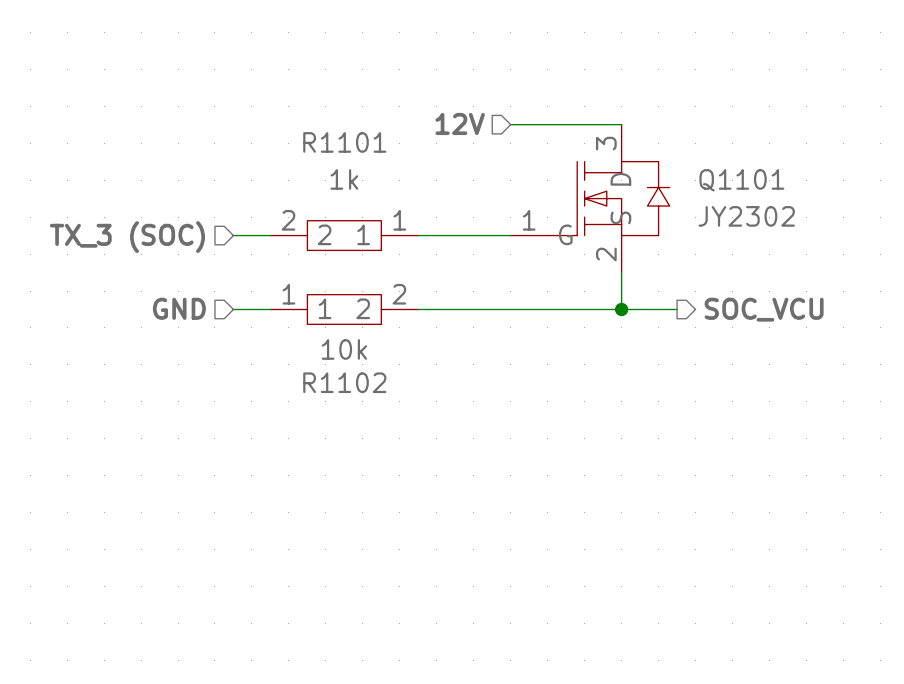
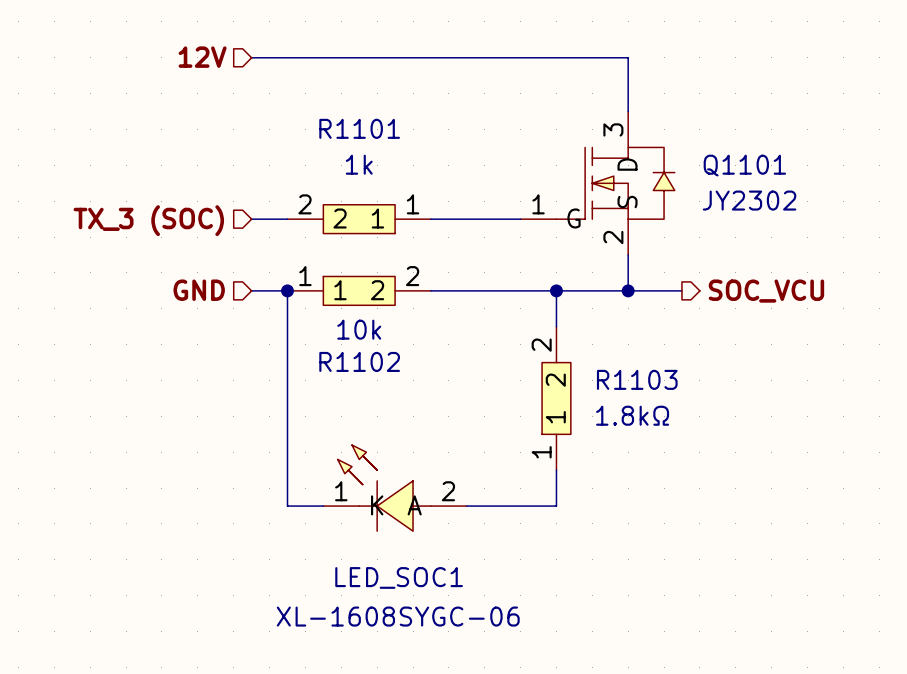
hierarchical label position: 12V (460, 123) -> 12V (202, 57)
wire: (510, 124) (621, 124) -> (251, 57) (628, 57) (628, 111)
wire: none -> (287, 290) (287, 506) (323, 506)
junction: none -> (287, 290)
wire: none -> (556, 290) (556, 326)
junction: none -> (556, 290)
R1103: none -> 1.8kΩ (556, 398)
wire: none -> (556, 470) (556, 506) (466, 506)
LED_SOC1: none -> XL-1608SYGC-06 (395, 488)

